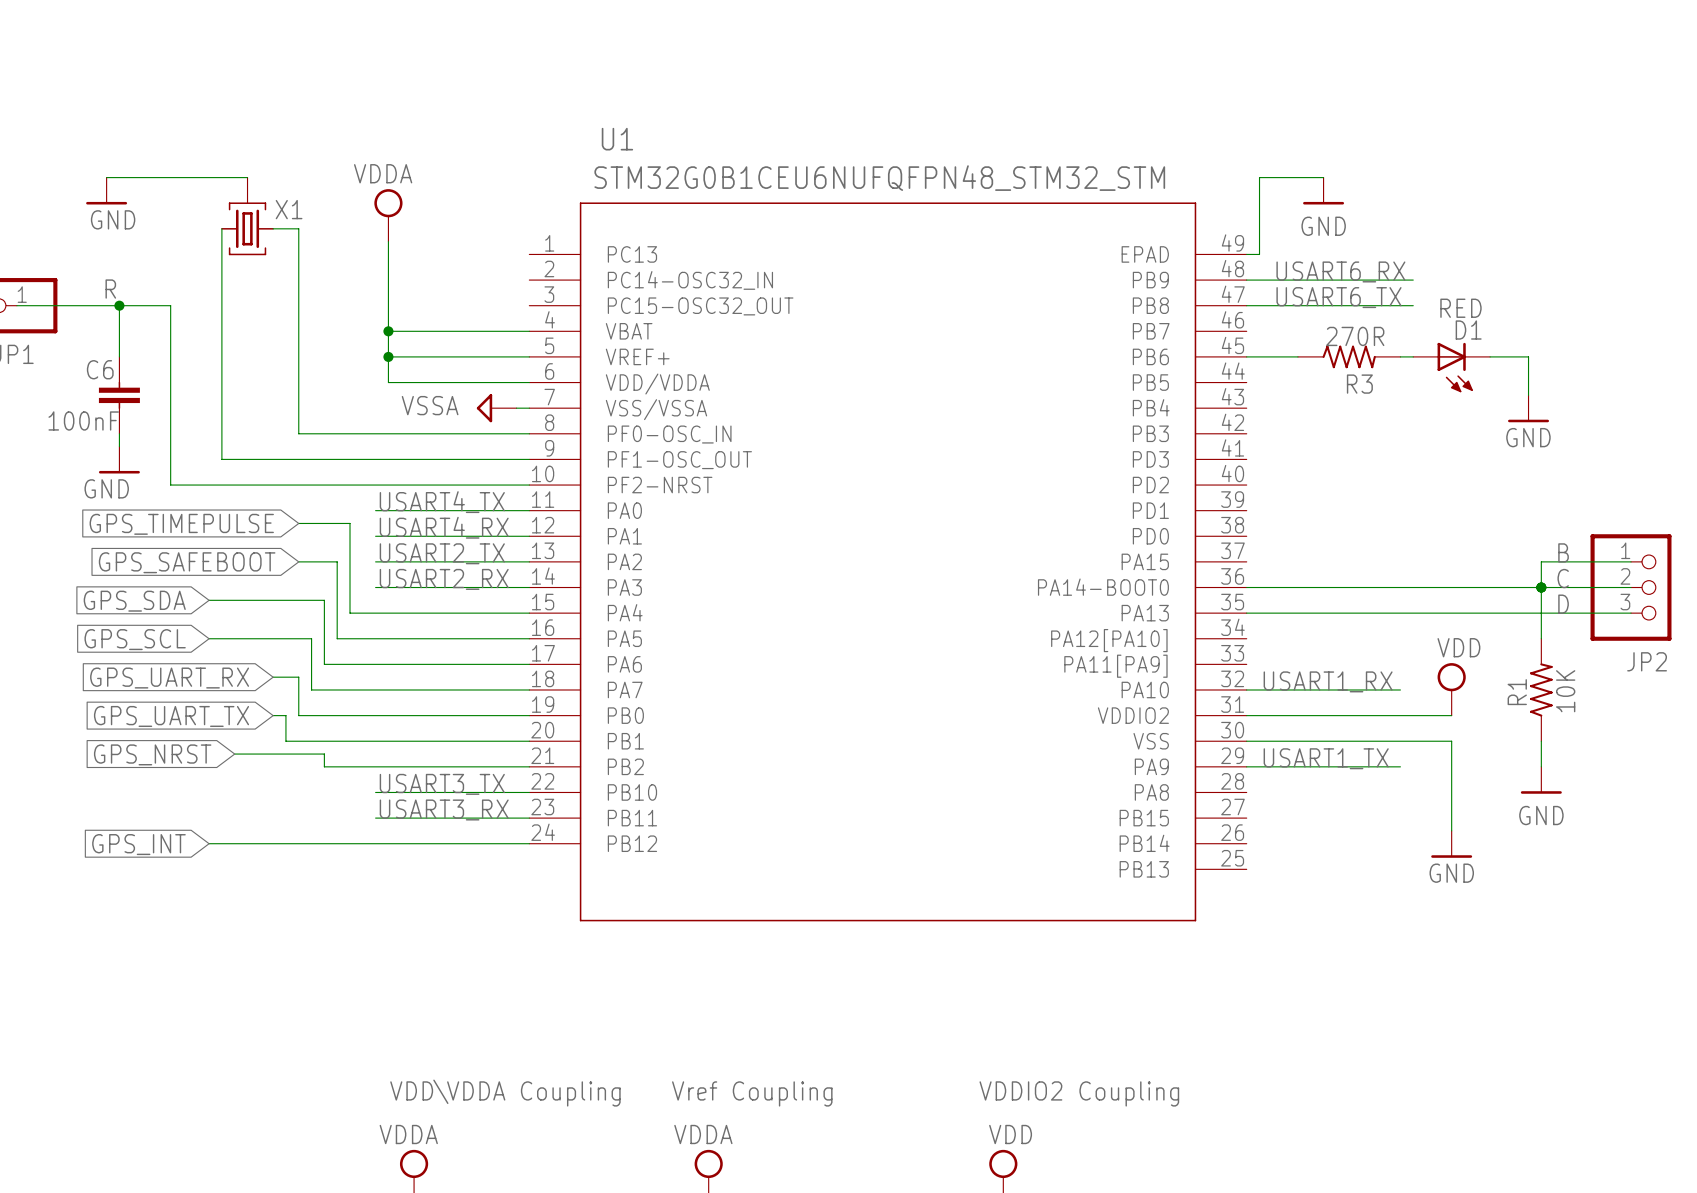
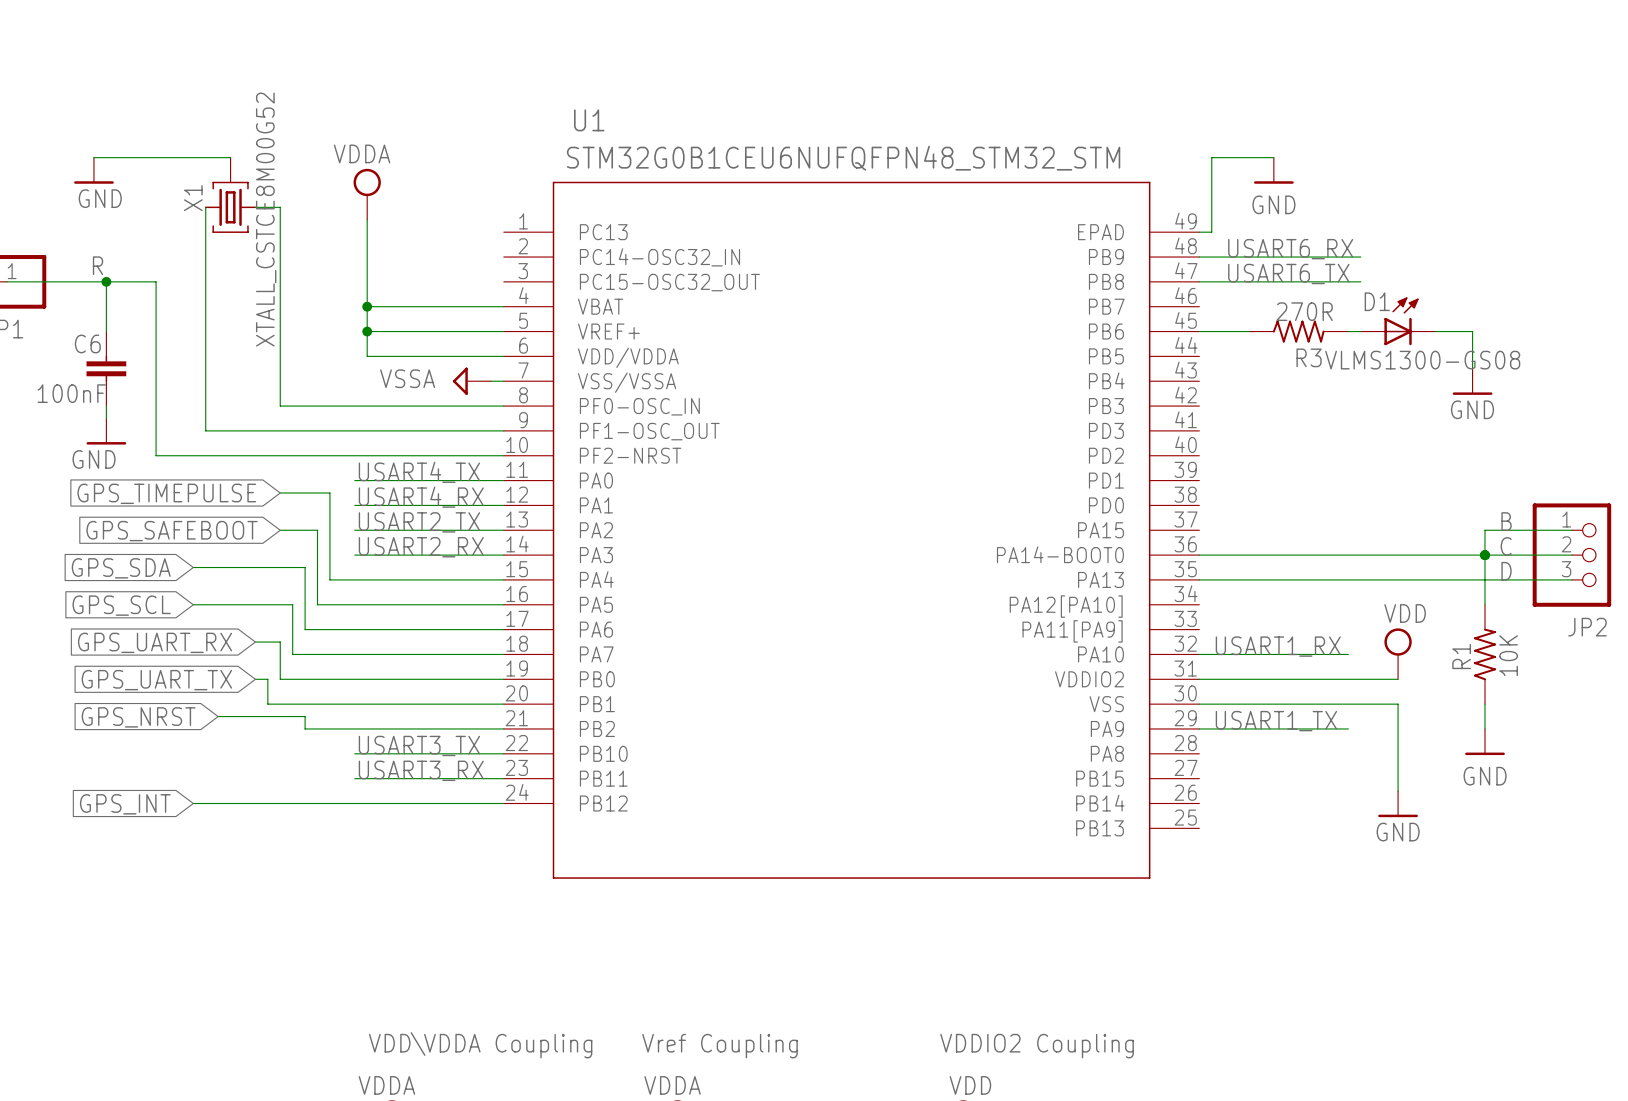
X1 name rotation: 0° (289, 209) -> 90° counterclockwise (193, 198)
X1 name position: X1 (289, 209) -> X1 (193, 198)
X1 value: none -> XTALL_CSTCE8M00G52 (266, 219)
D1 value: RED (1460, 308) -> VLMS1300-GS08 (1422, 360)
D1 name position: D1 (1468, 330) -> D1 (1377, 301)
D1 flip: as is (1455, 367) -> up-down (1401, 321)

